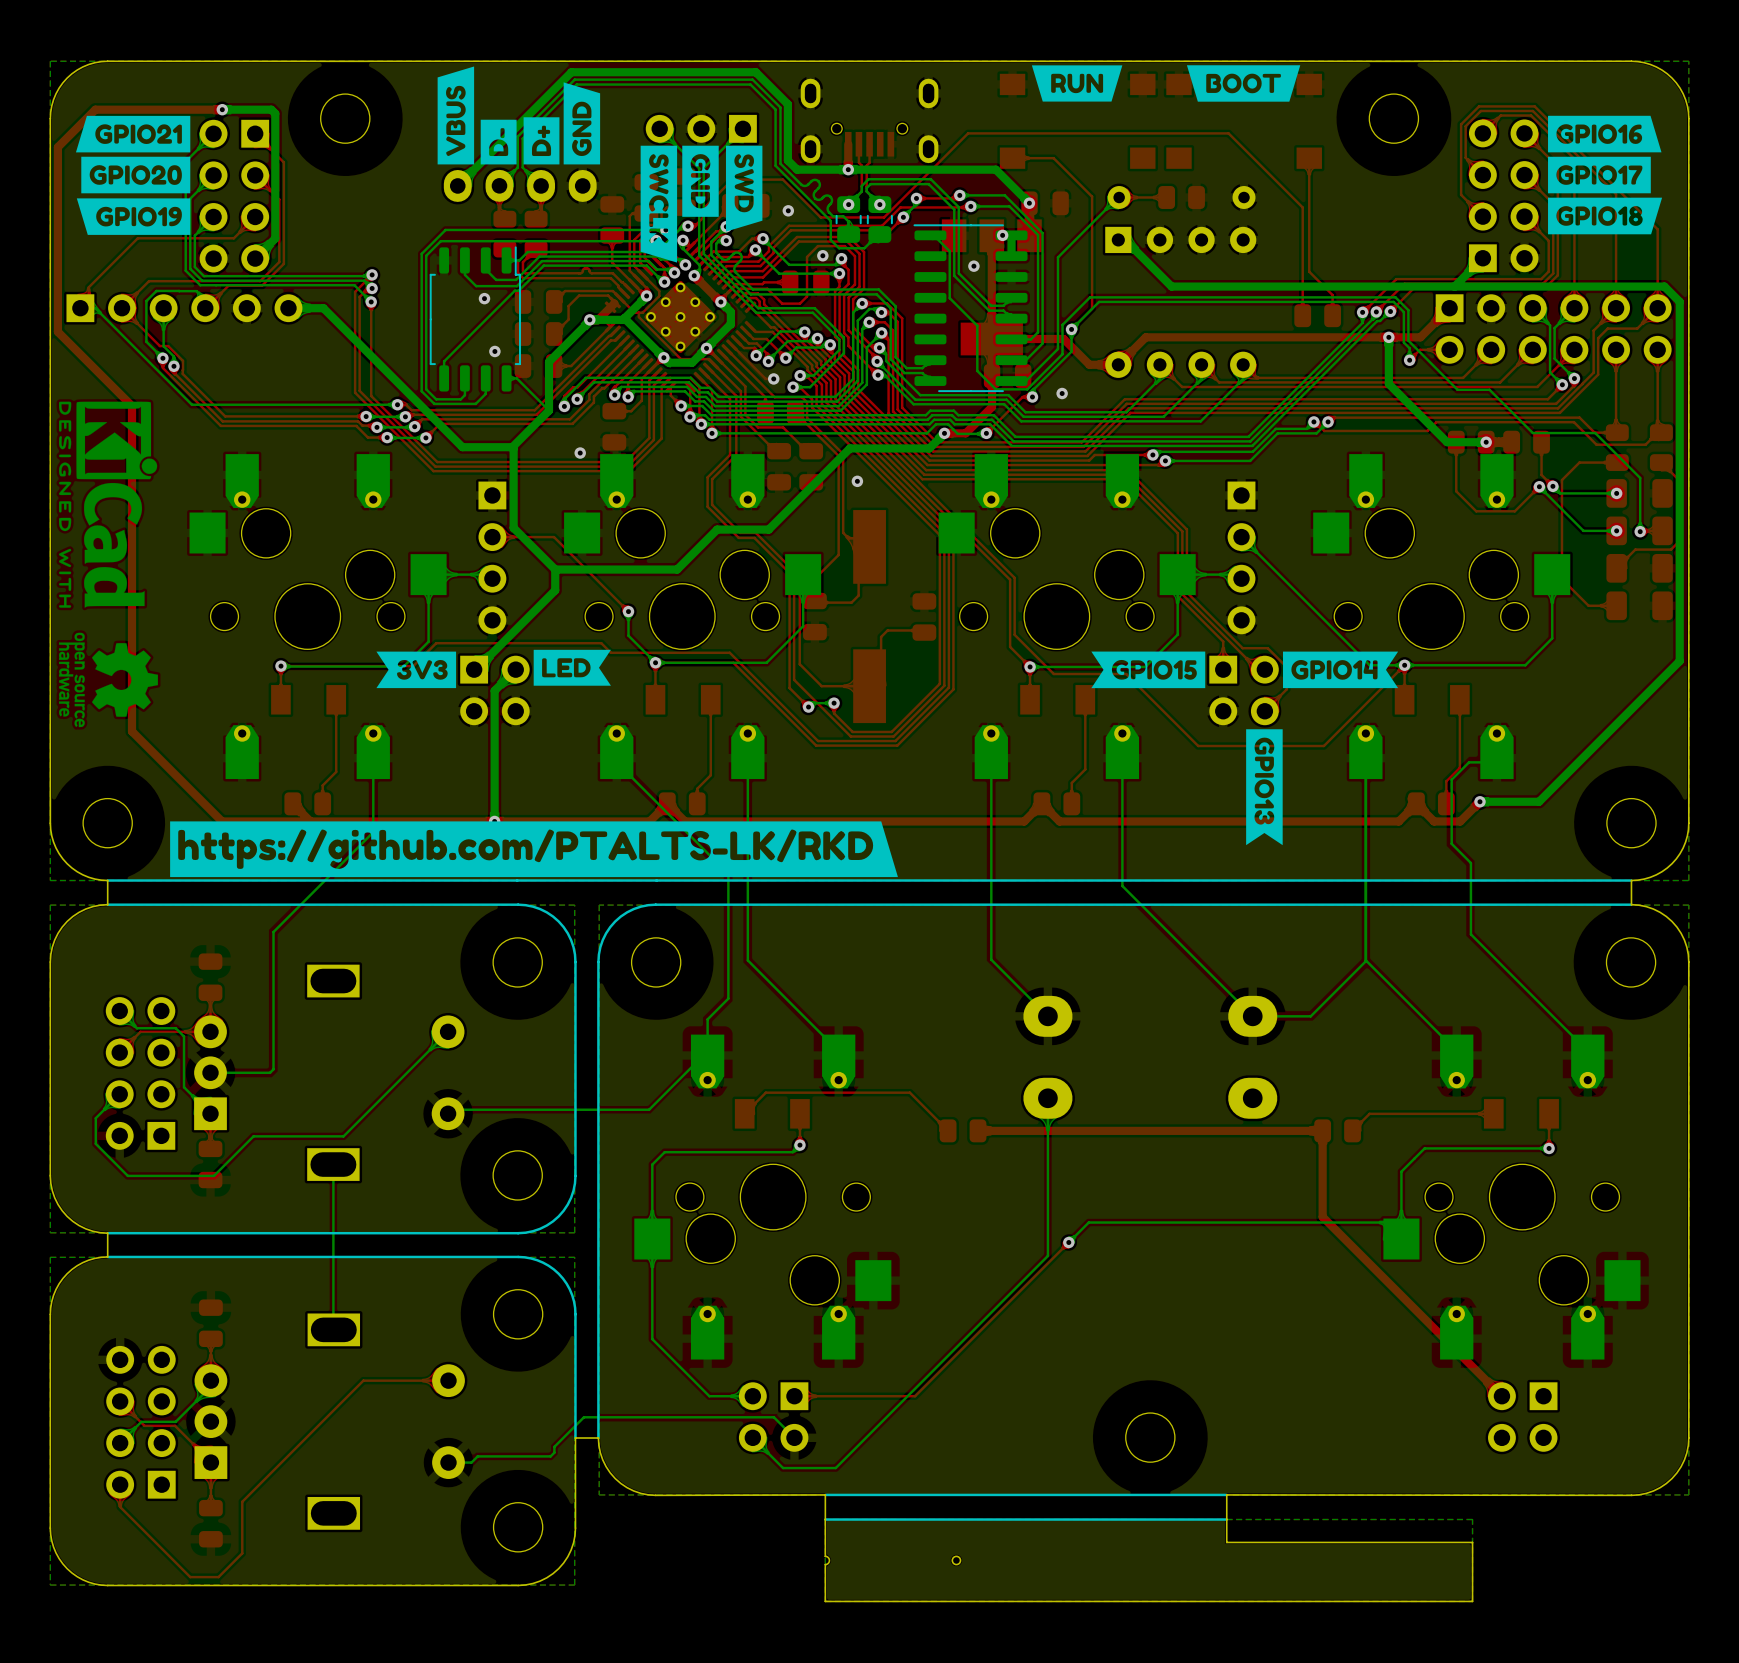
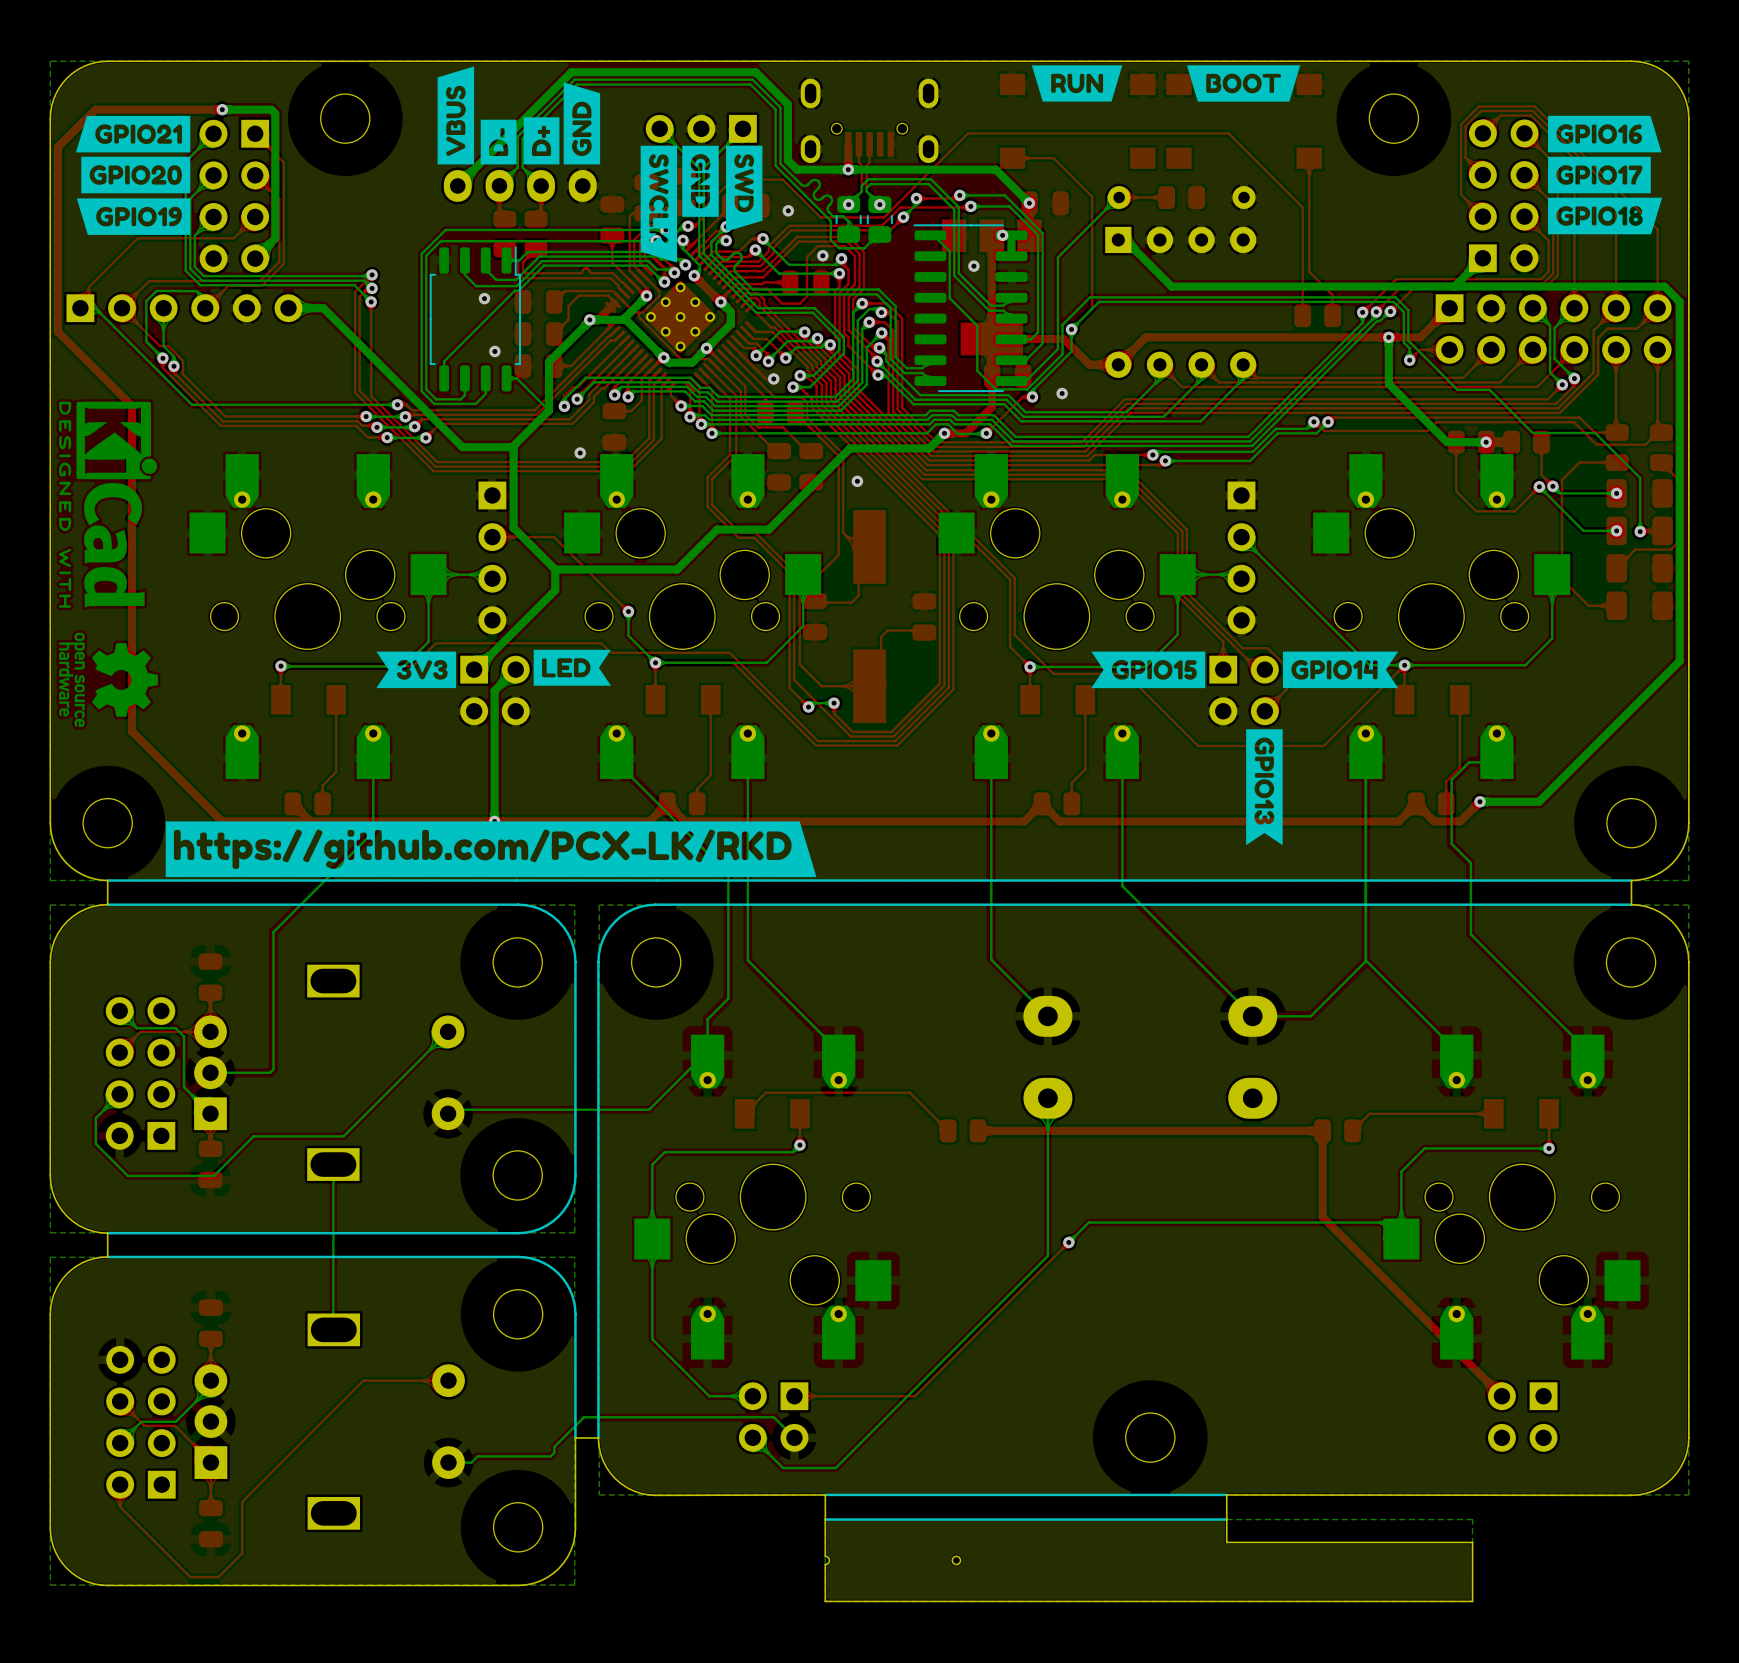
drawing: none -> [165, 821, 817, 878]
drawing: [170, 821, 898, 878] -> none

